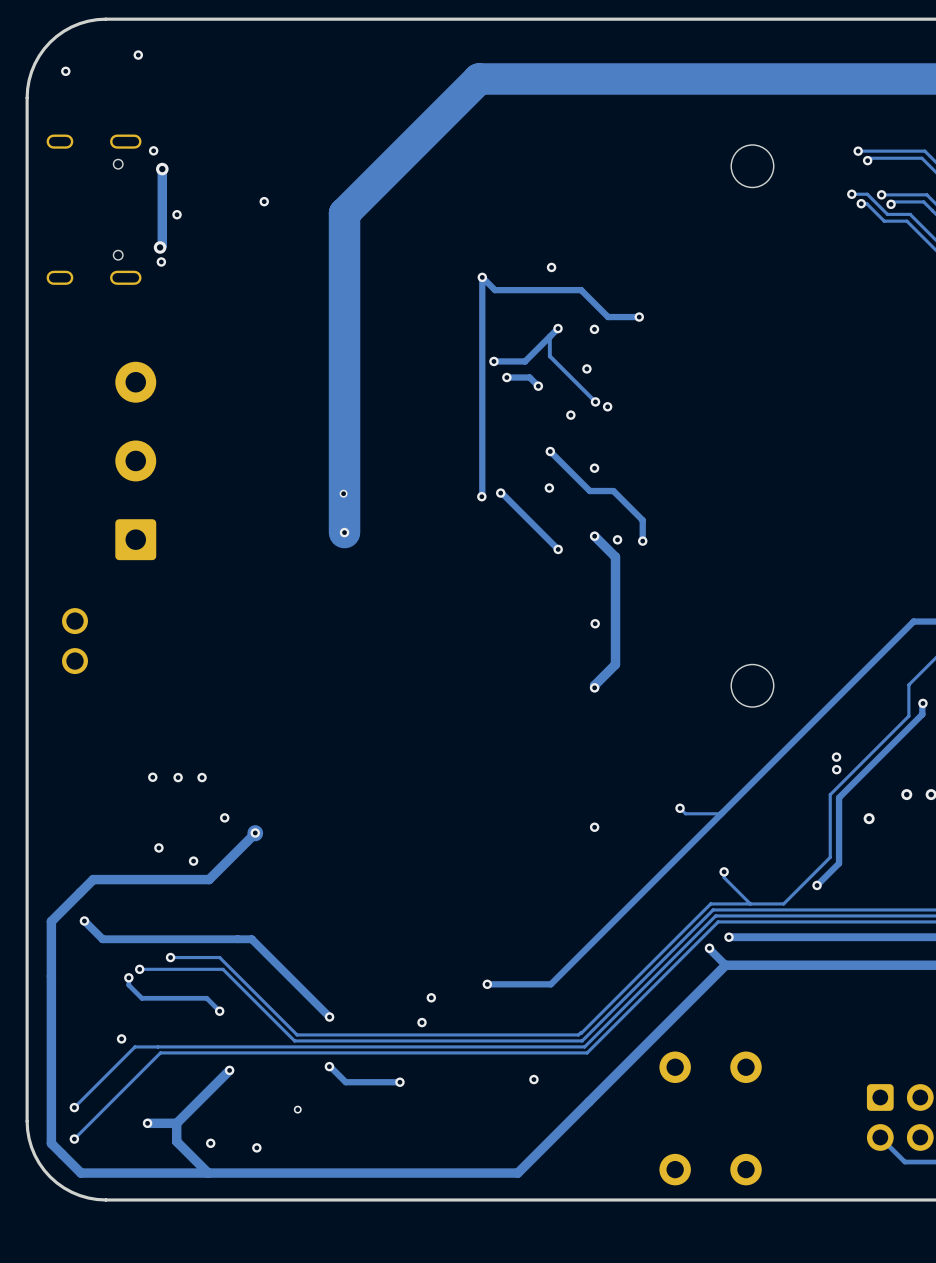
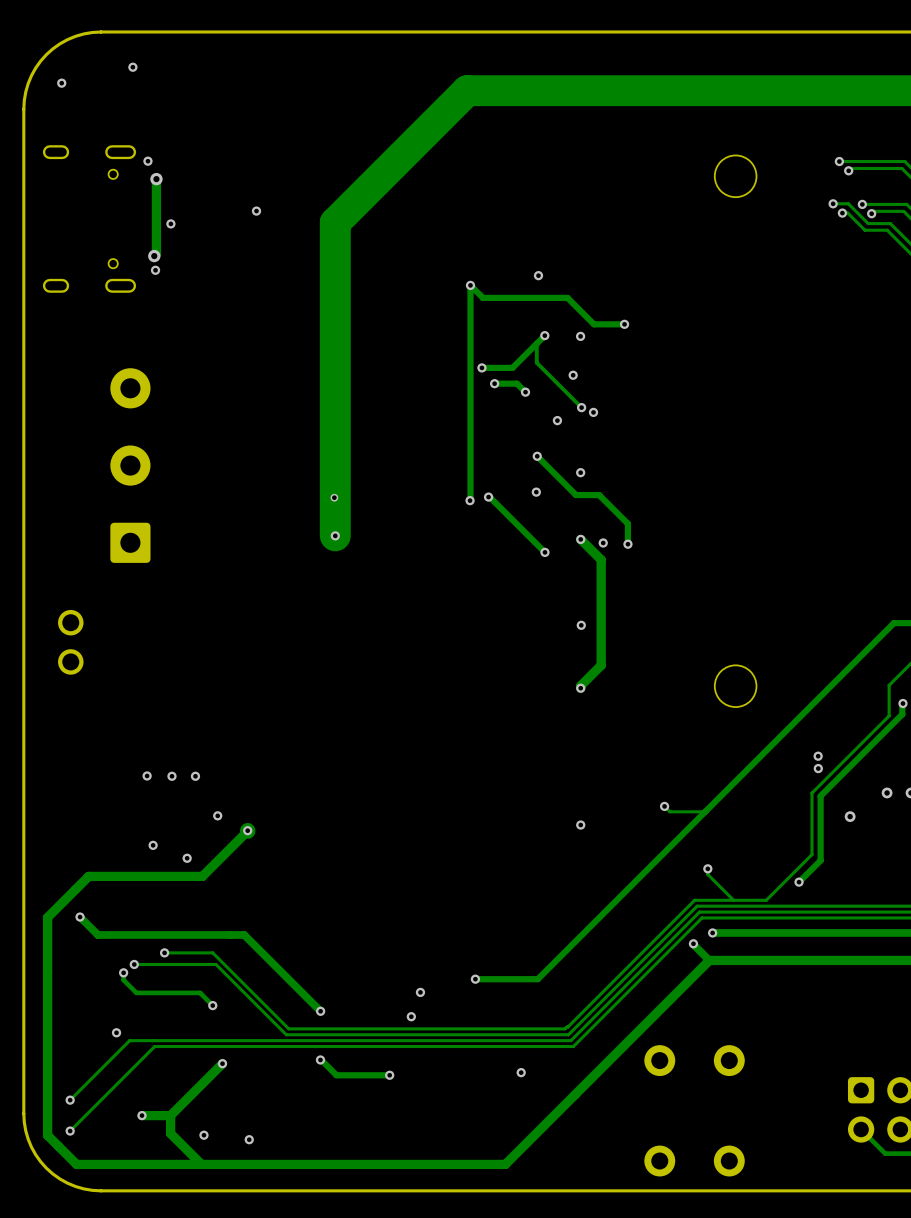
via: (297, 1109) -> none

